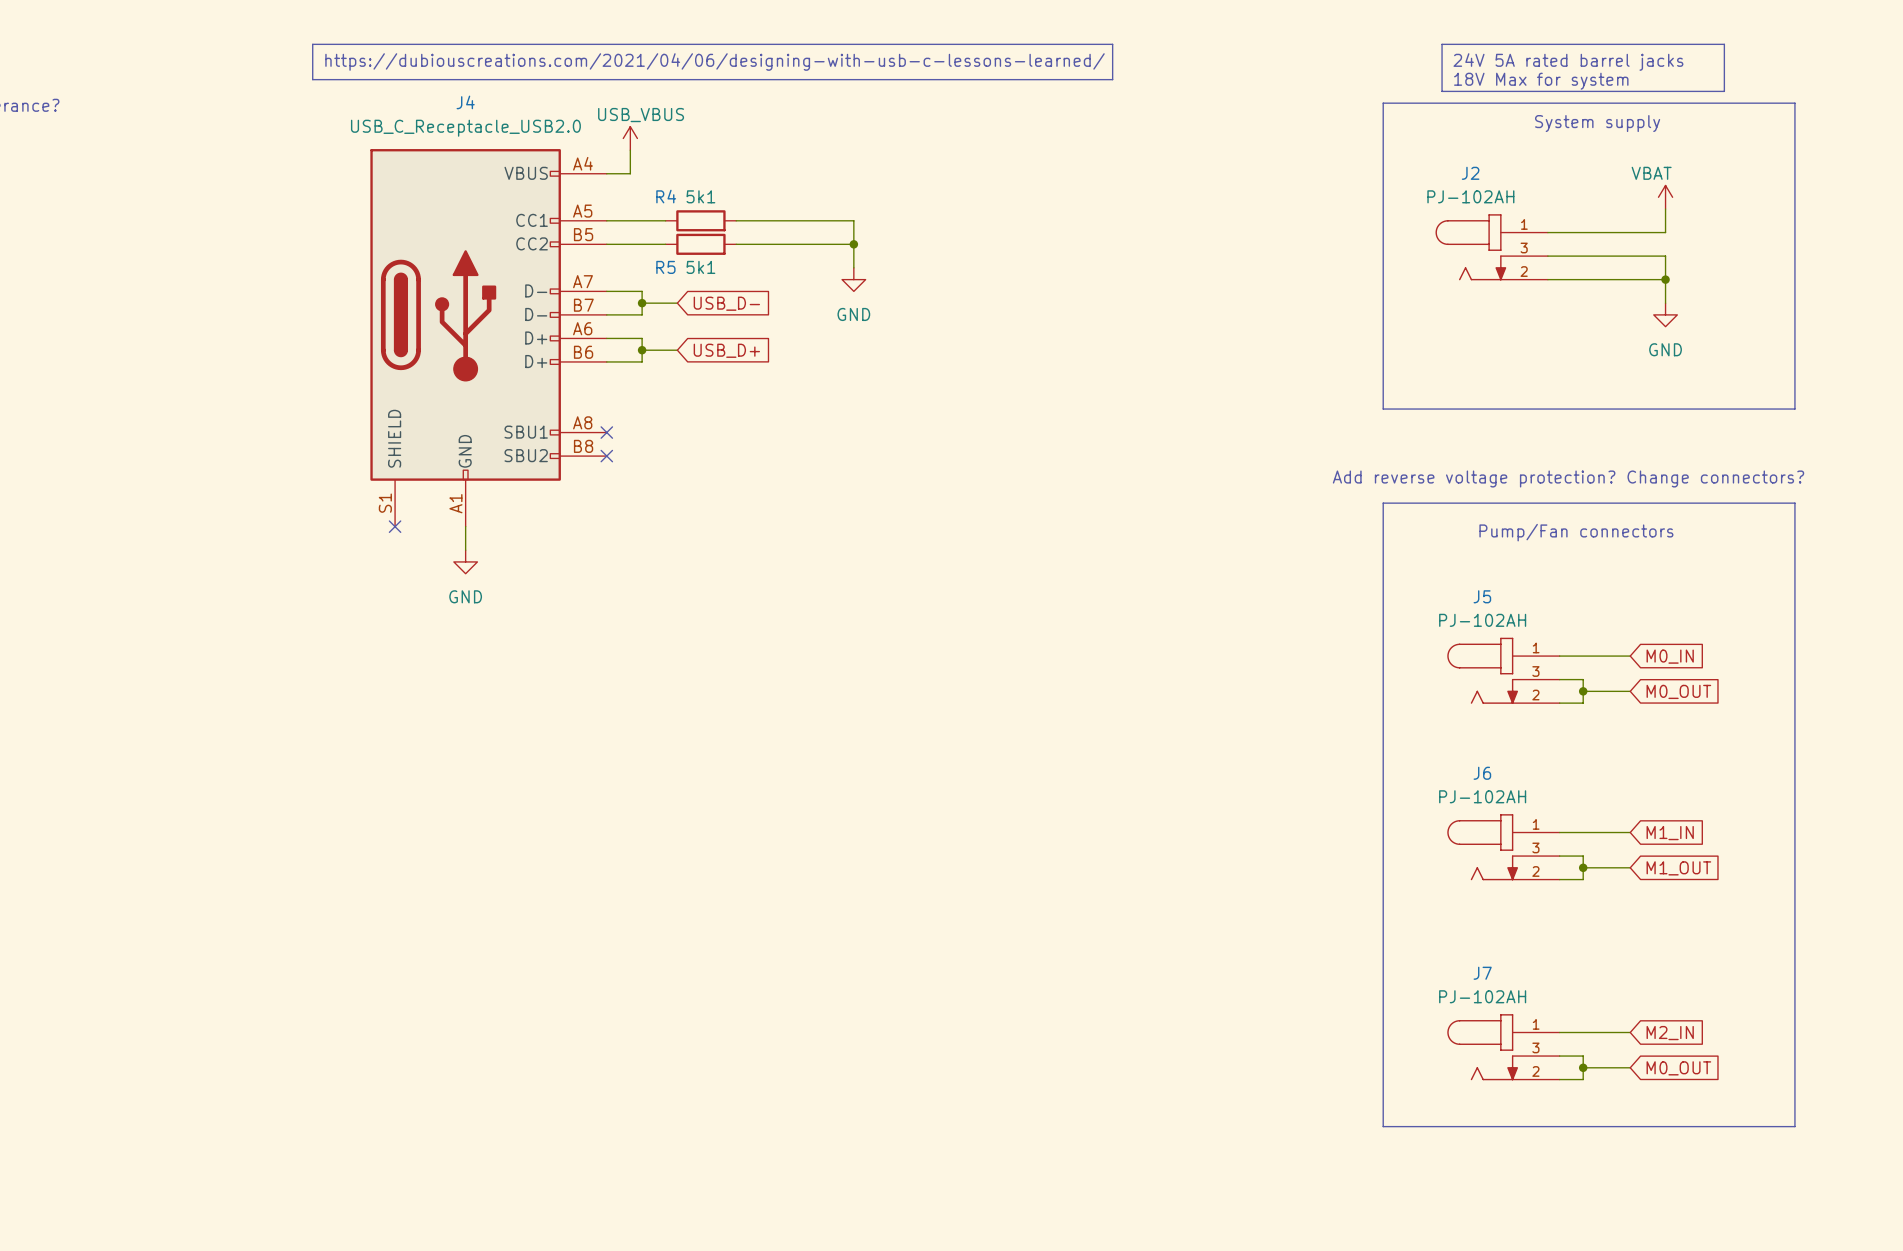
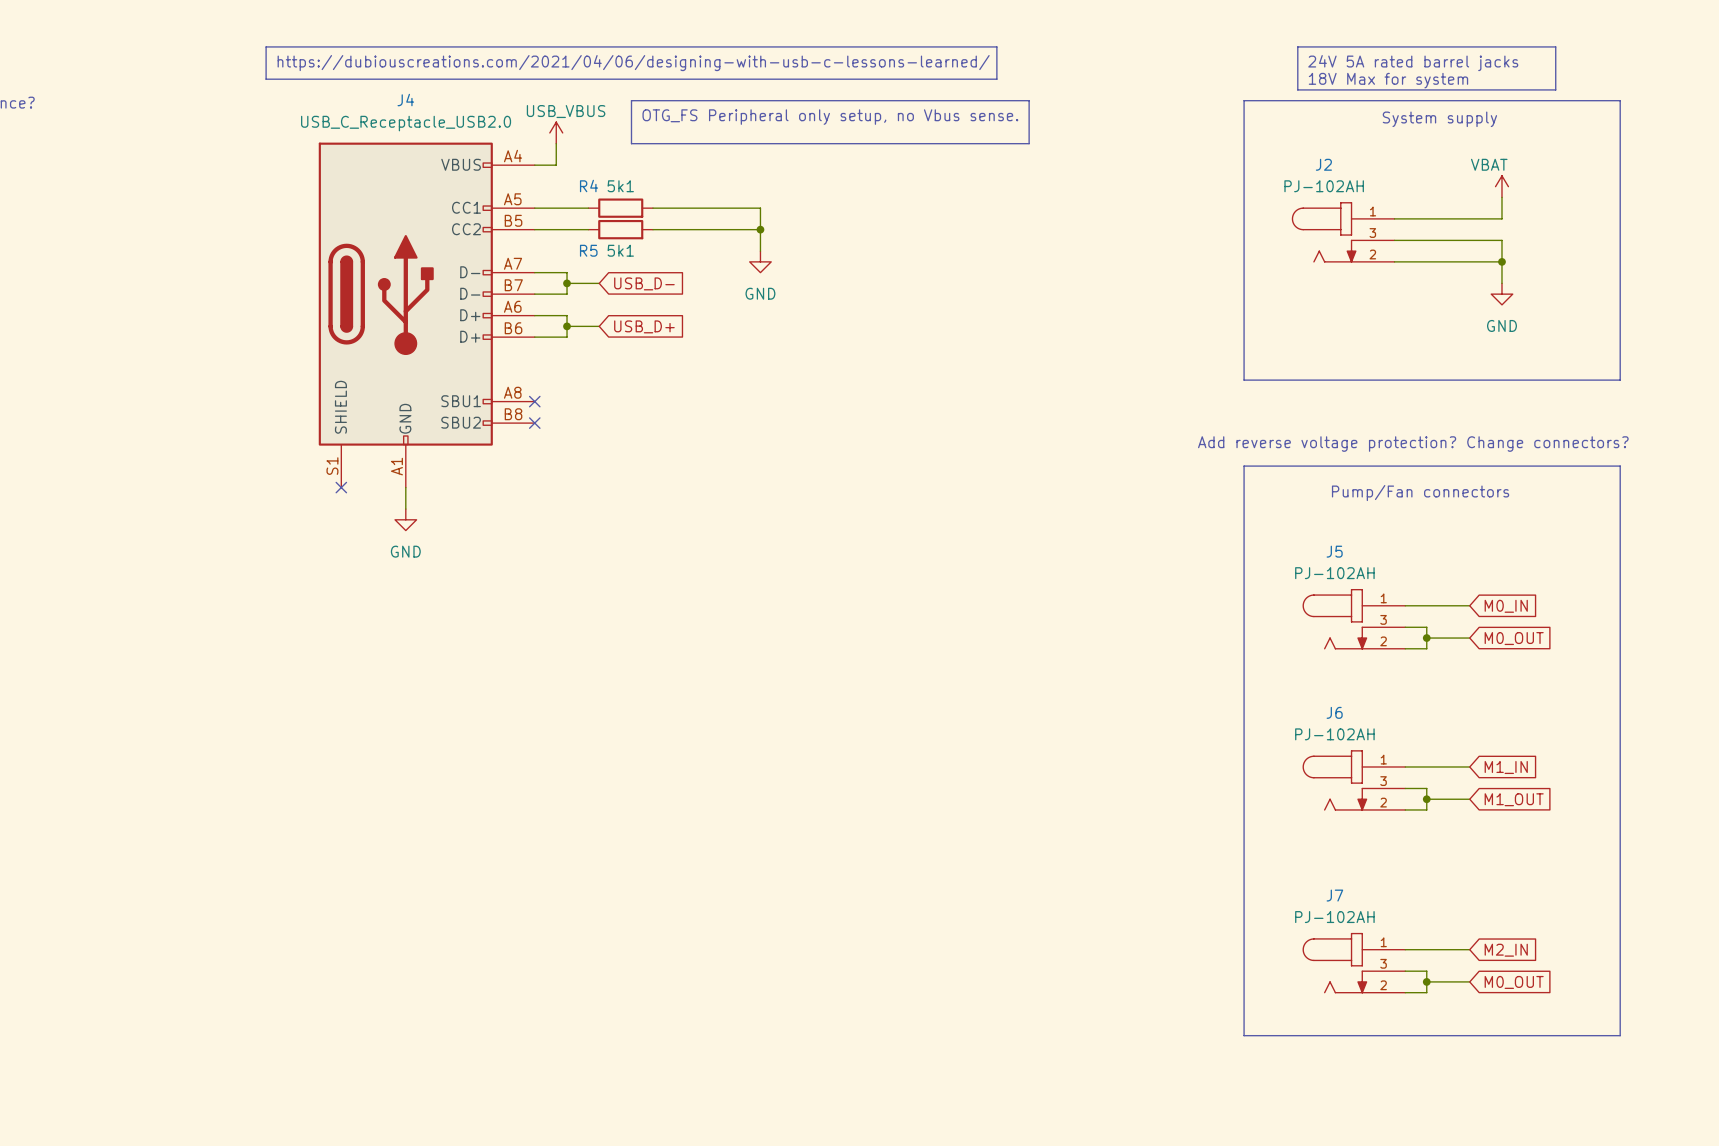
line: none -> (631, 100) (1029, 100) (1029, 143) (631, 143) (631, 100)
text: none -> OTG_FS Peripheral only setup, no Vbus sense. (830, 117)

